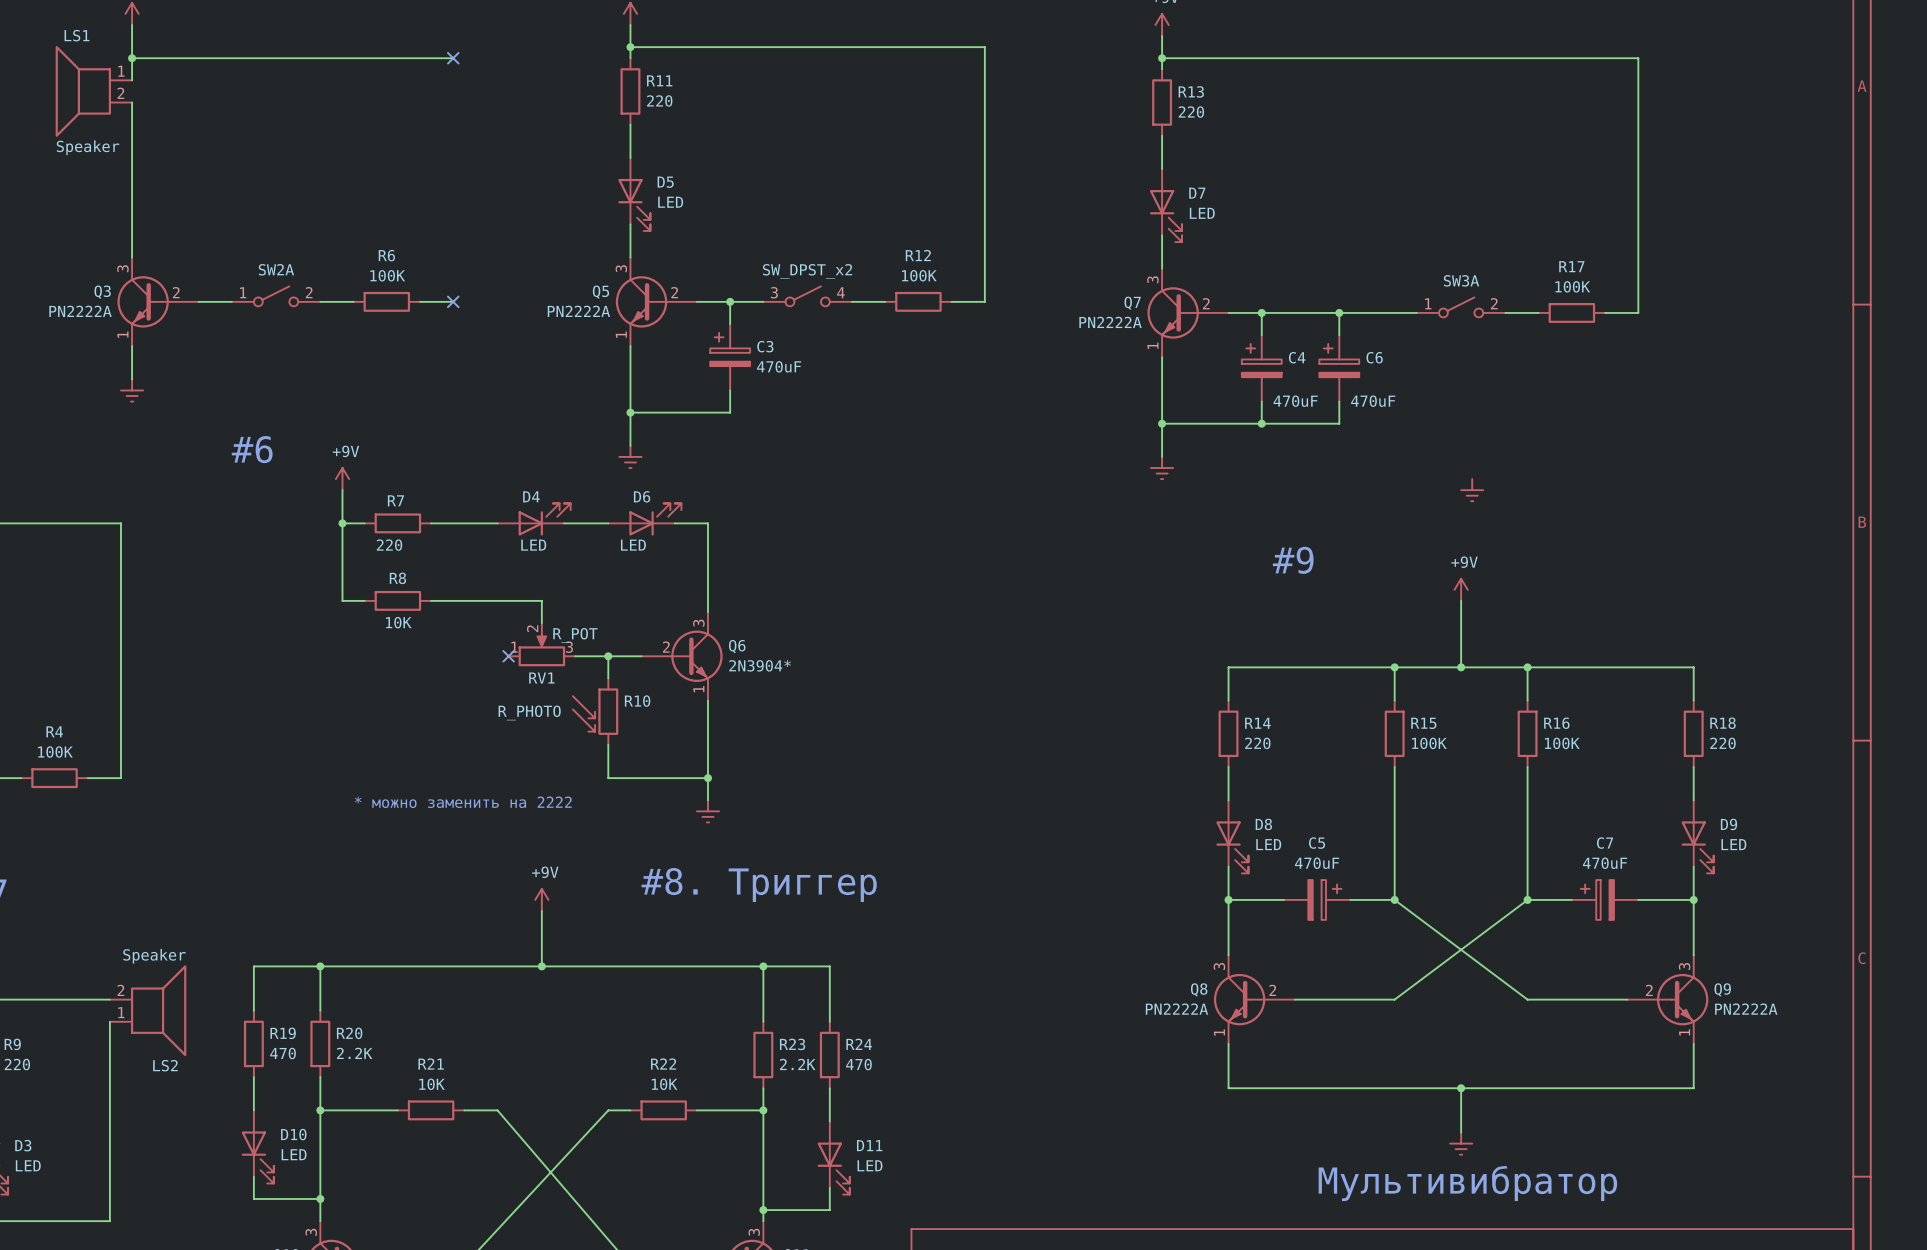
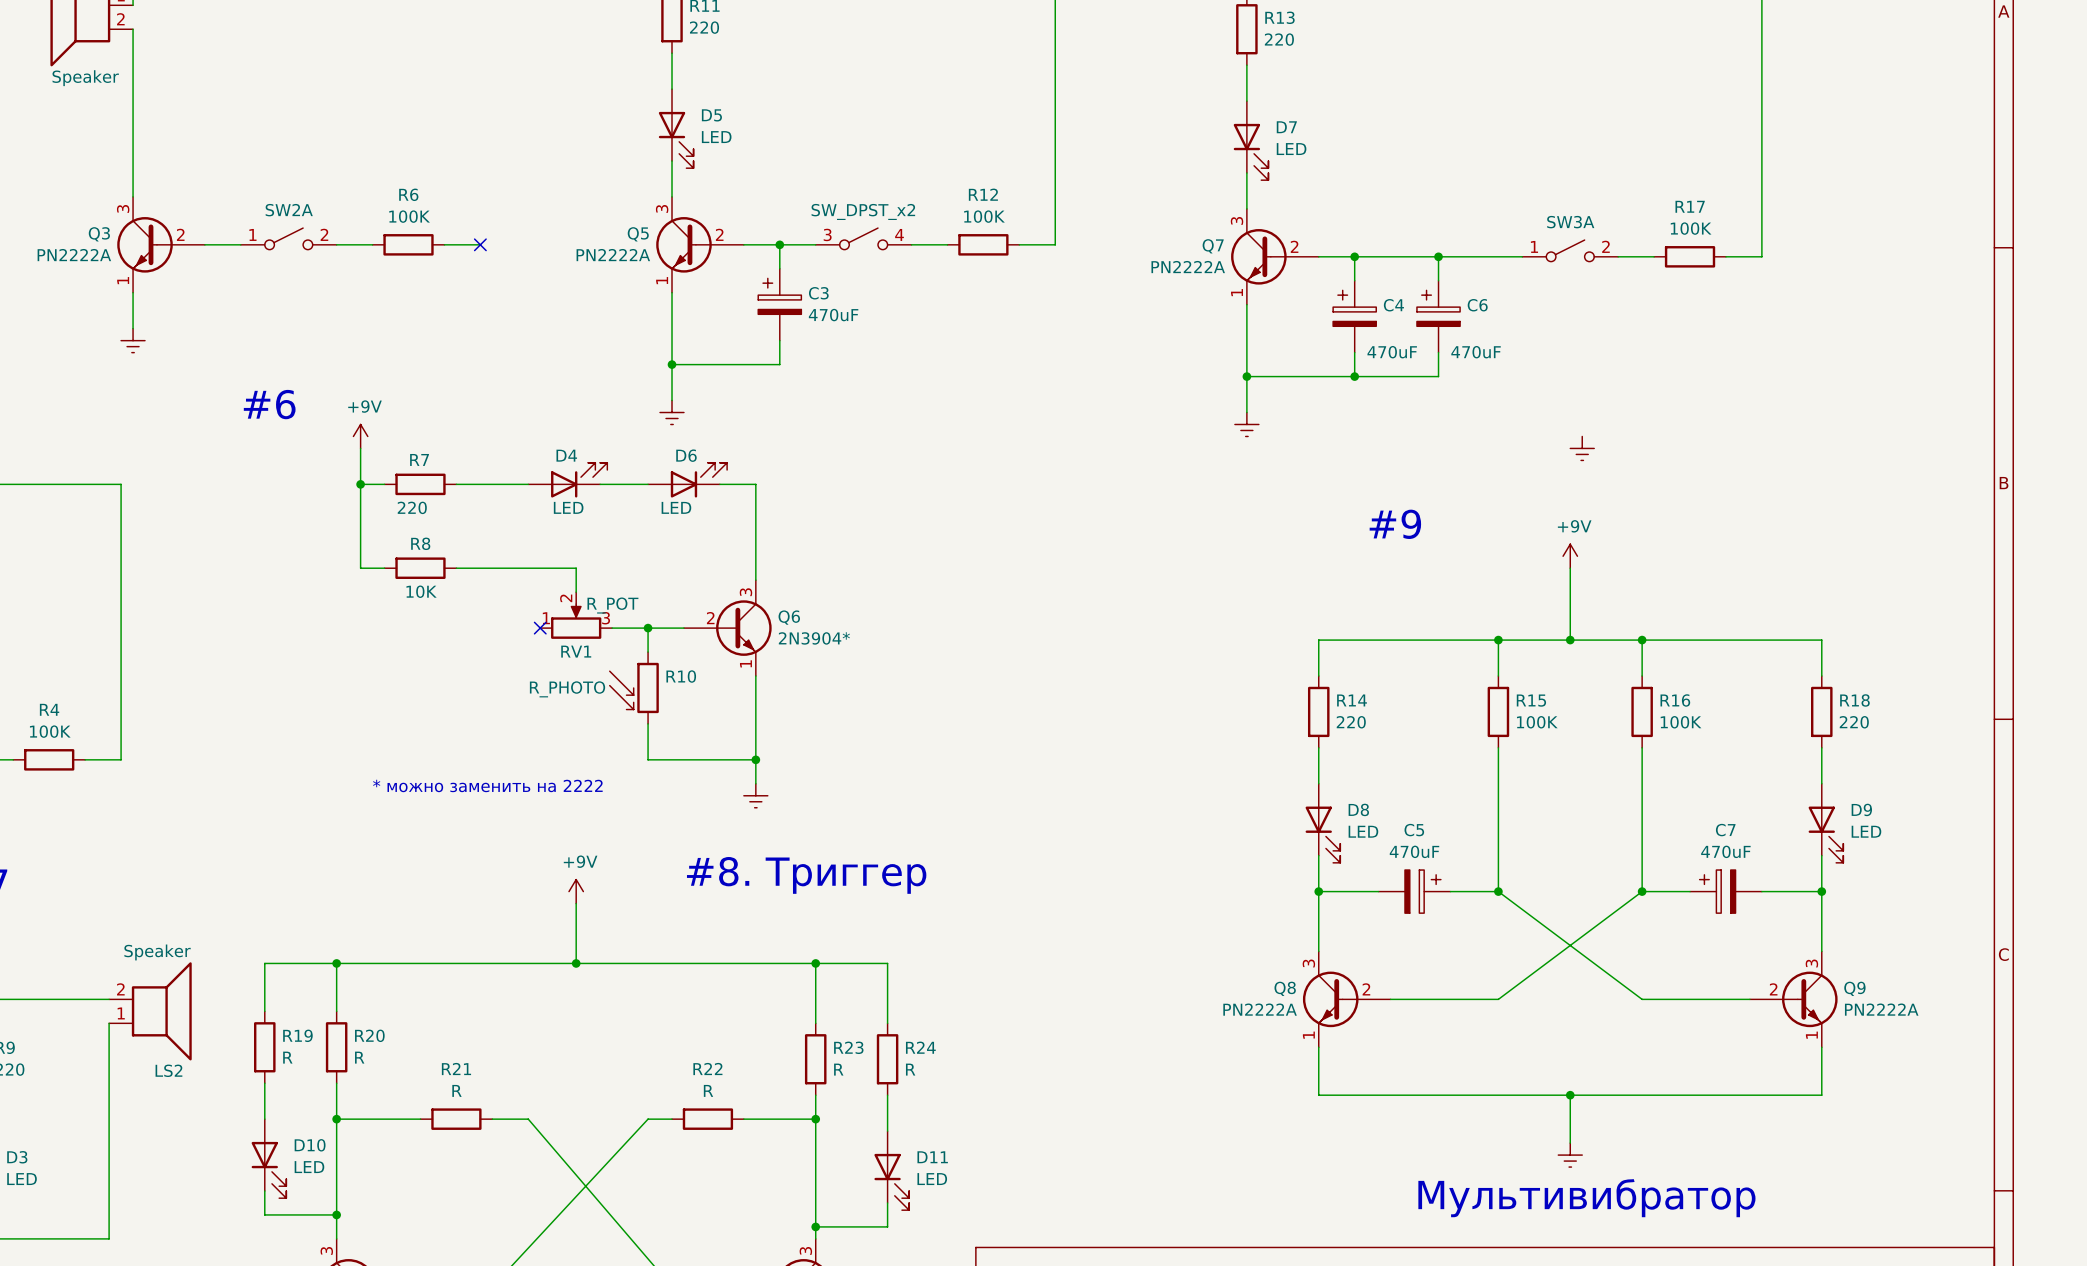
R19 value: 470 (283, 1053) -> R (287, 1057)
R20 value: 2.2K (354, 1053) -> R (359, 1057)
R23 value: 2.2K (797, 1064) -> R (838, 1069)
R24 value: 470 (858, 1064) -> R (910, 1069)
R21 value: 10K (431, 1084) -> R (456, 1090)
R22 value: 10K (664, 1084) -> R (708, 1090)

